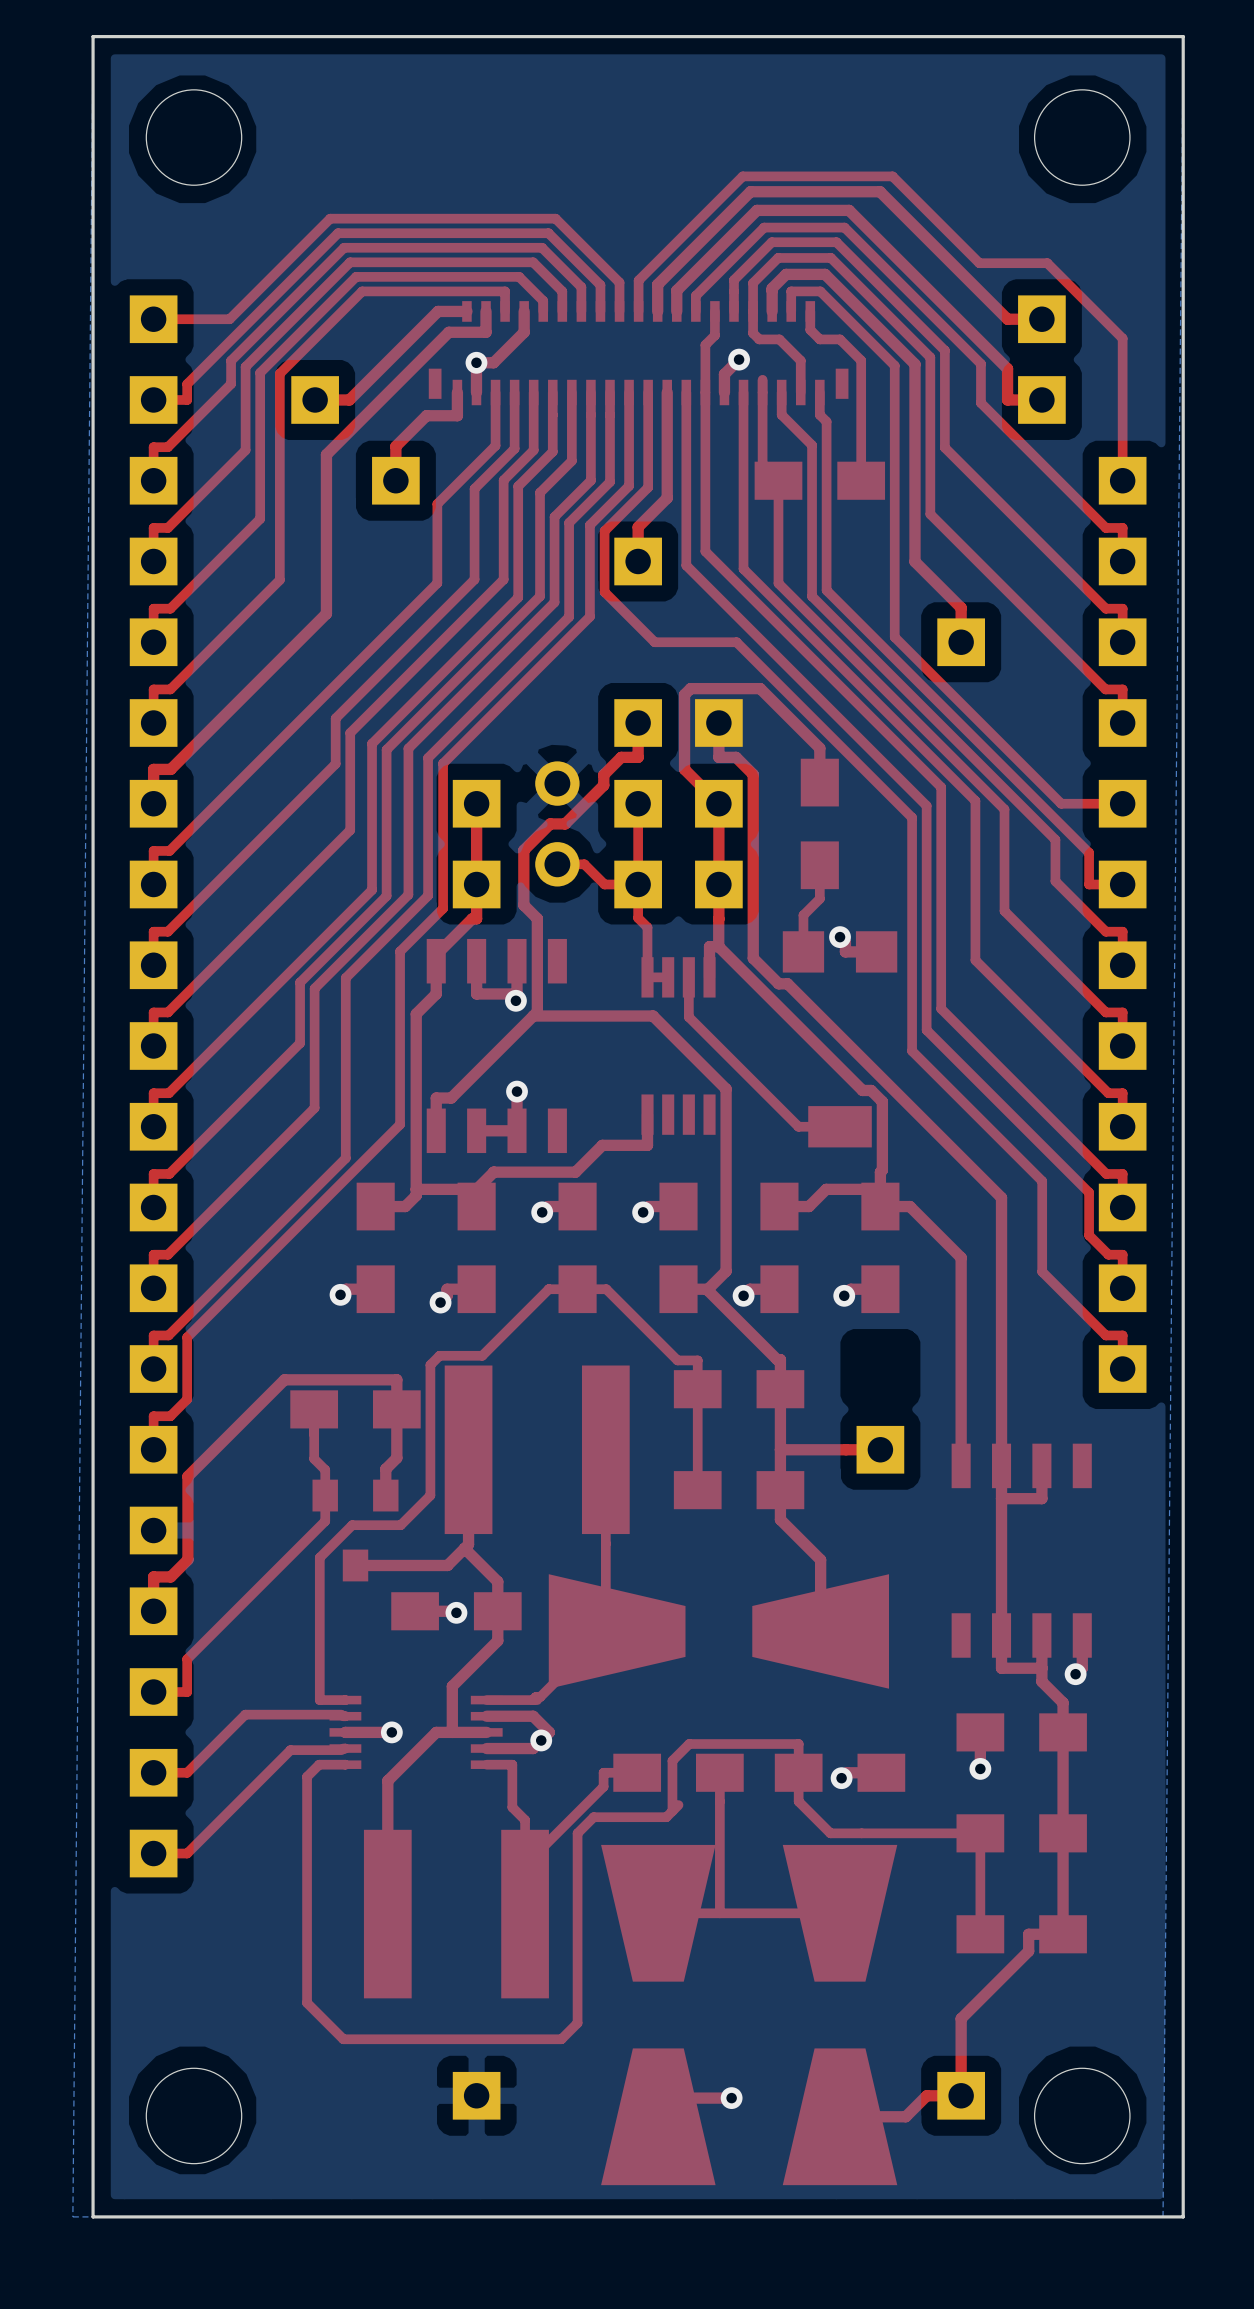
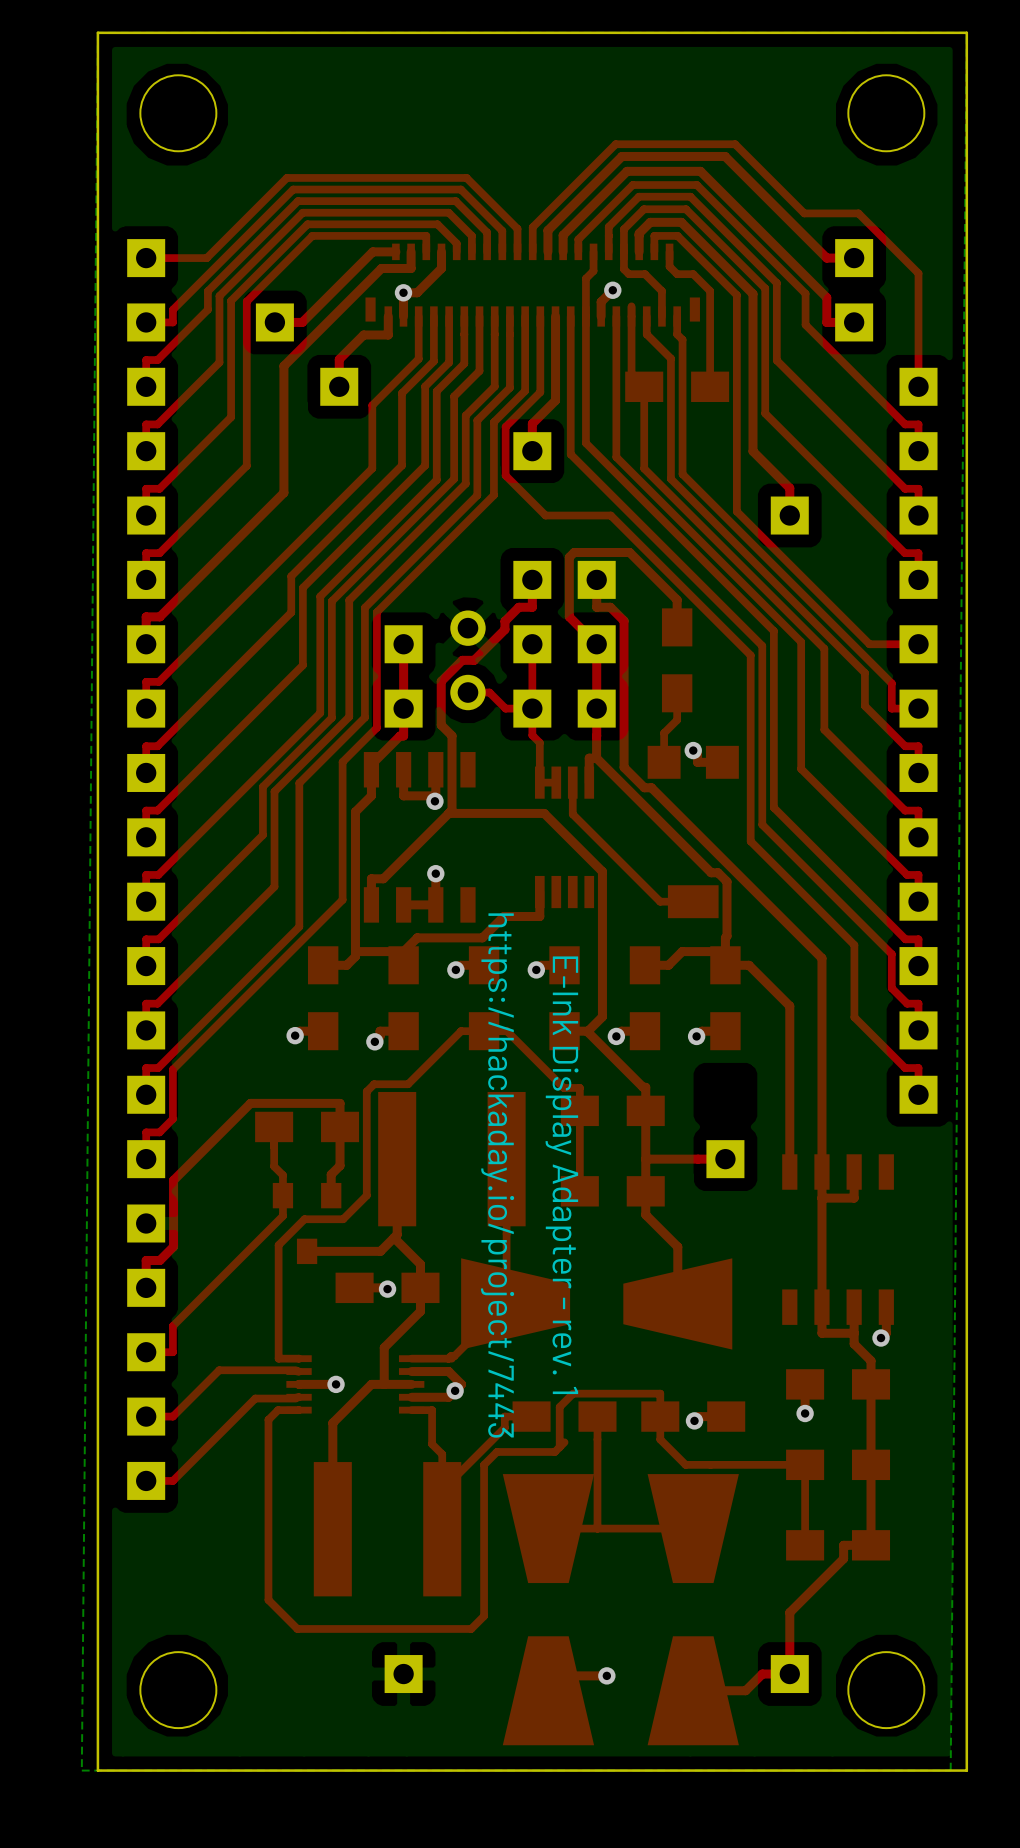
text: none -> https://hackaday.io/project/7443 (497, 1175)
text: none -> E-Ink Display Adapter - rev. 1 (562, 1175)

